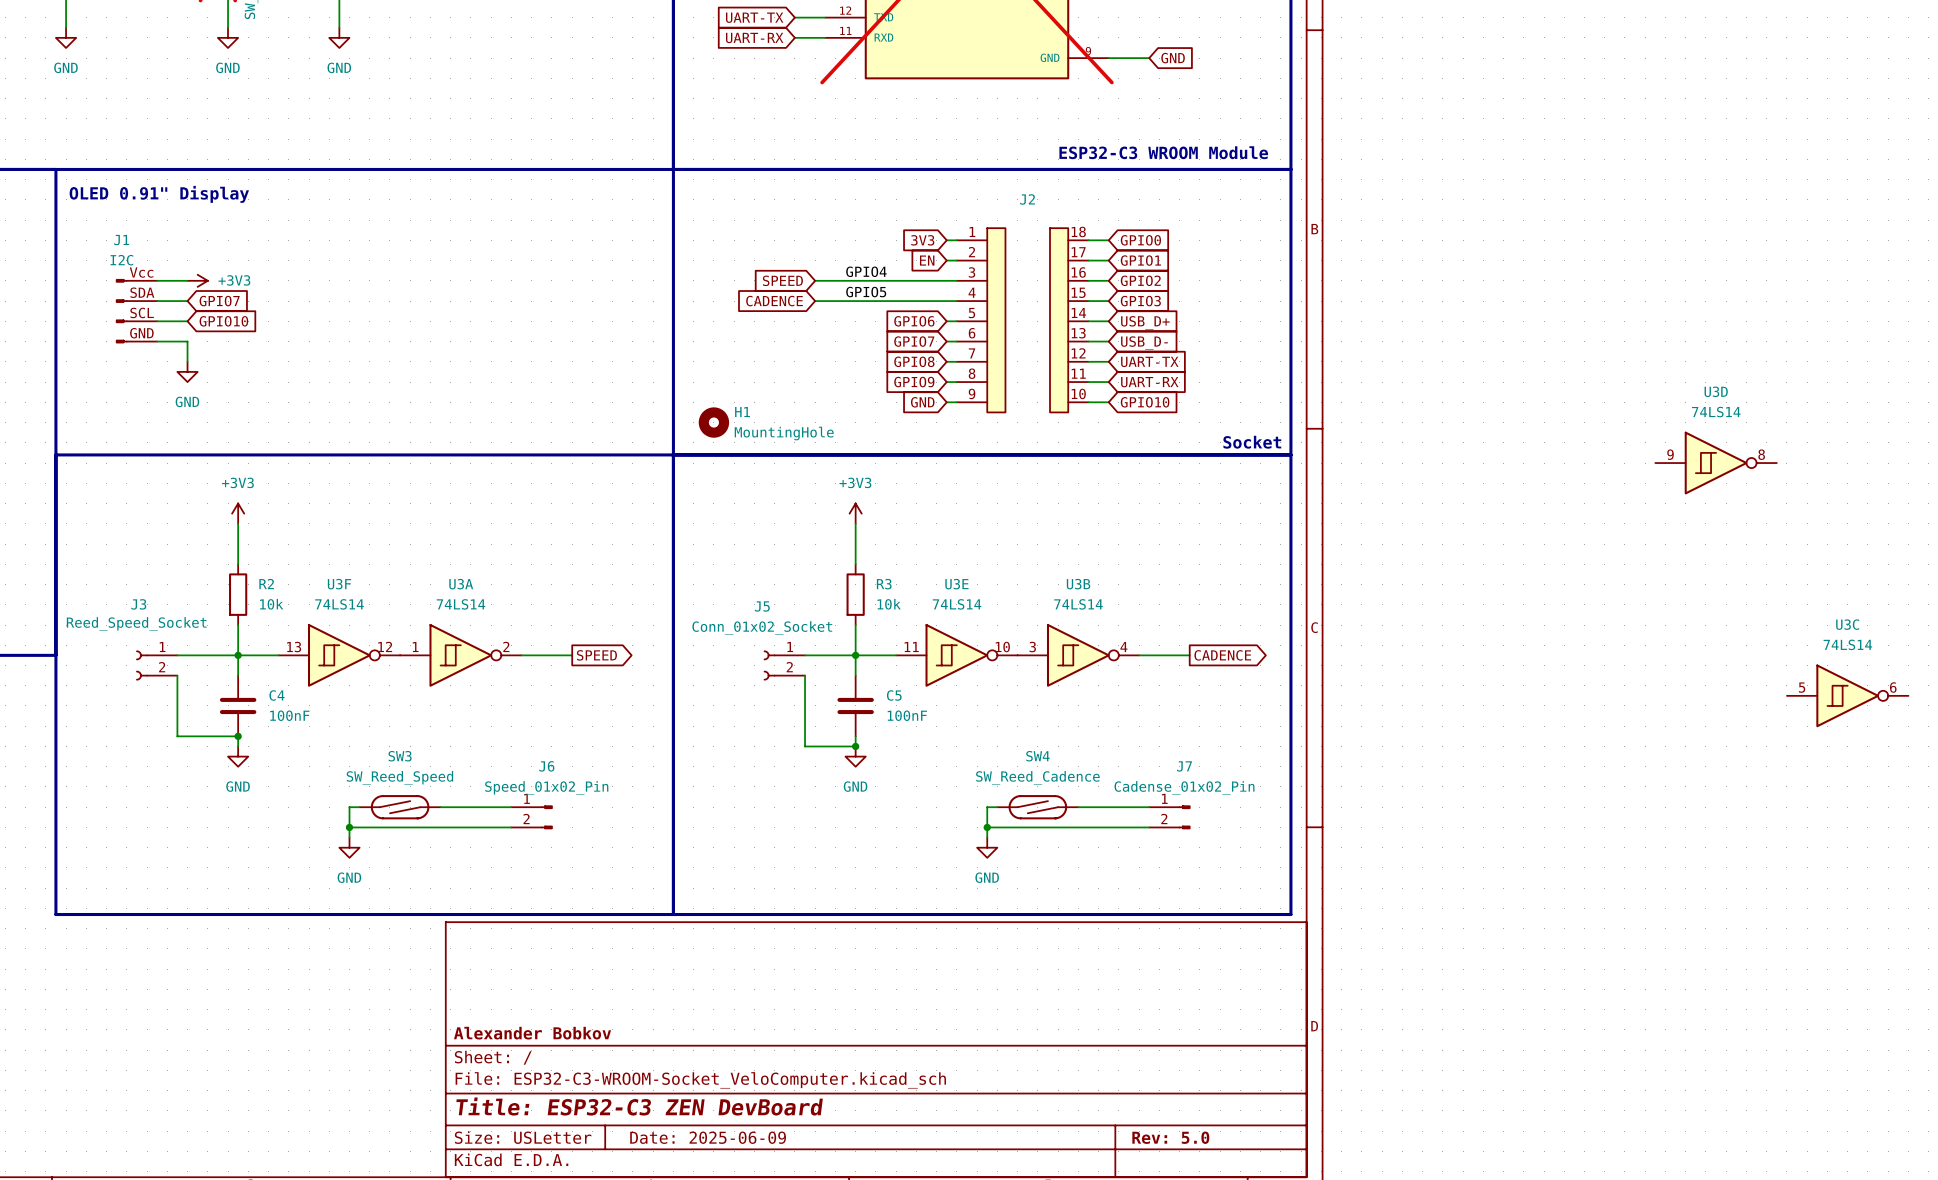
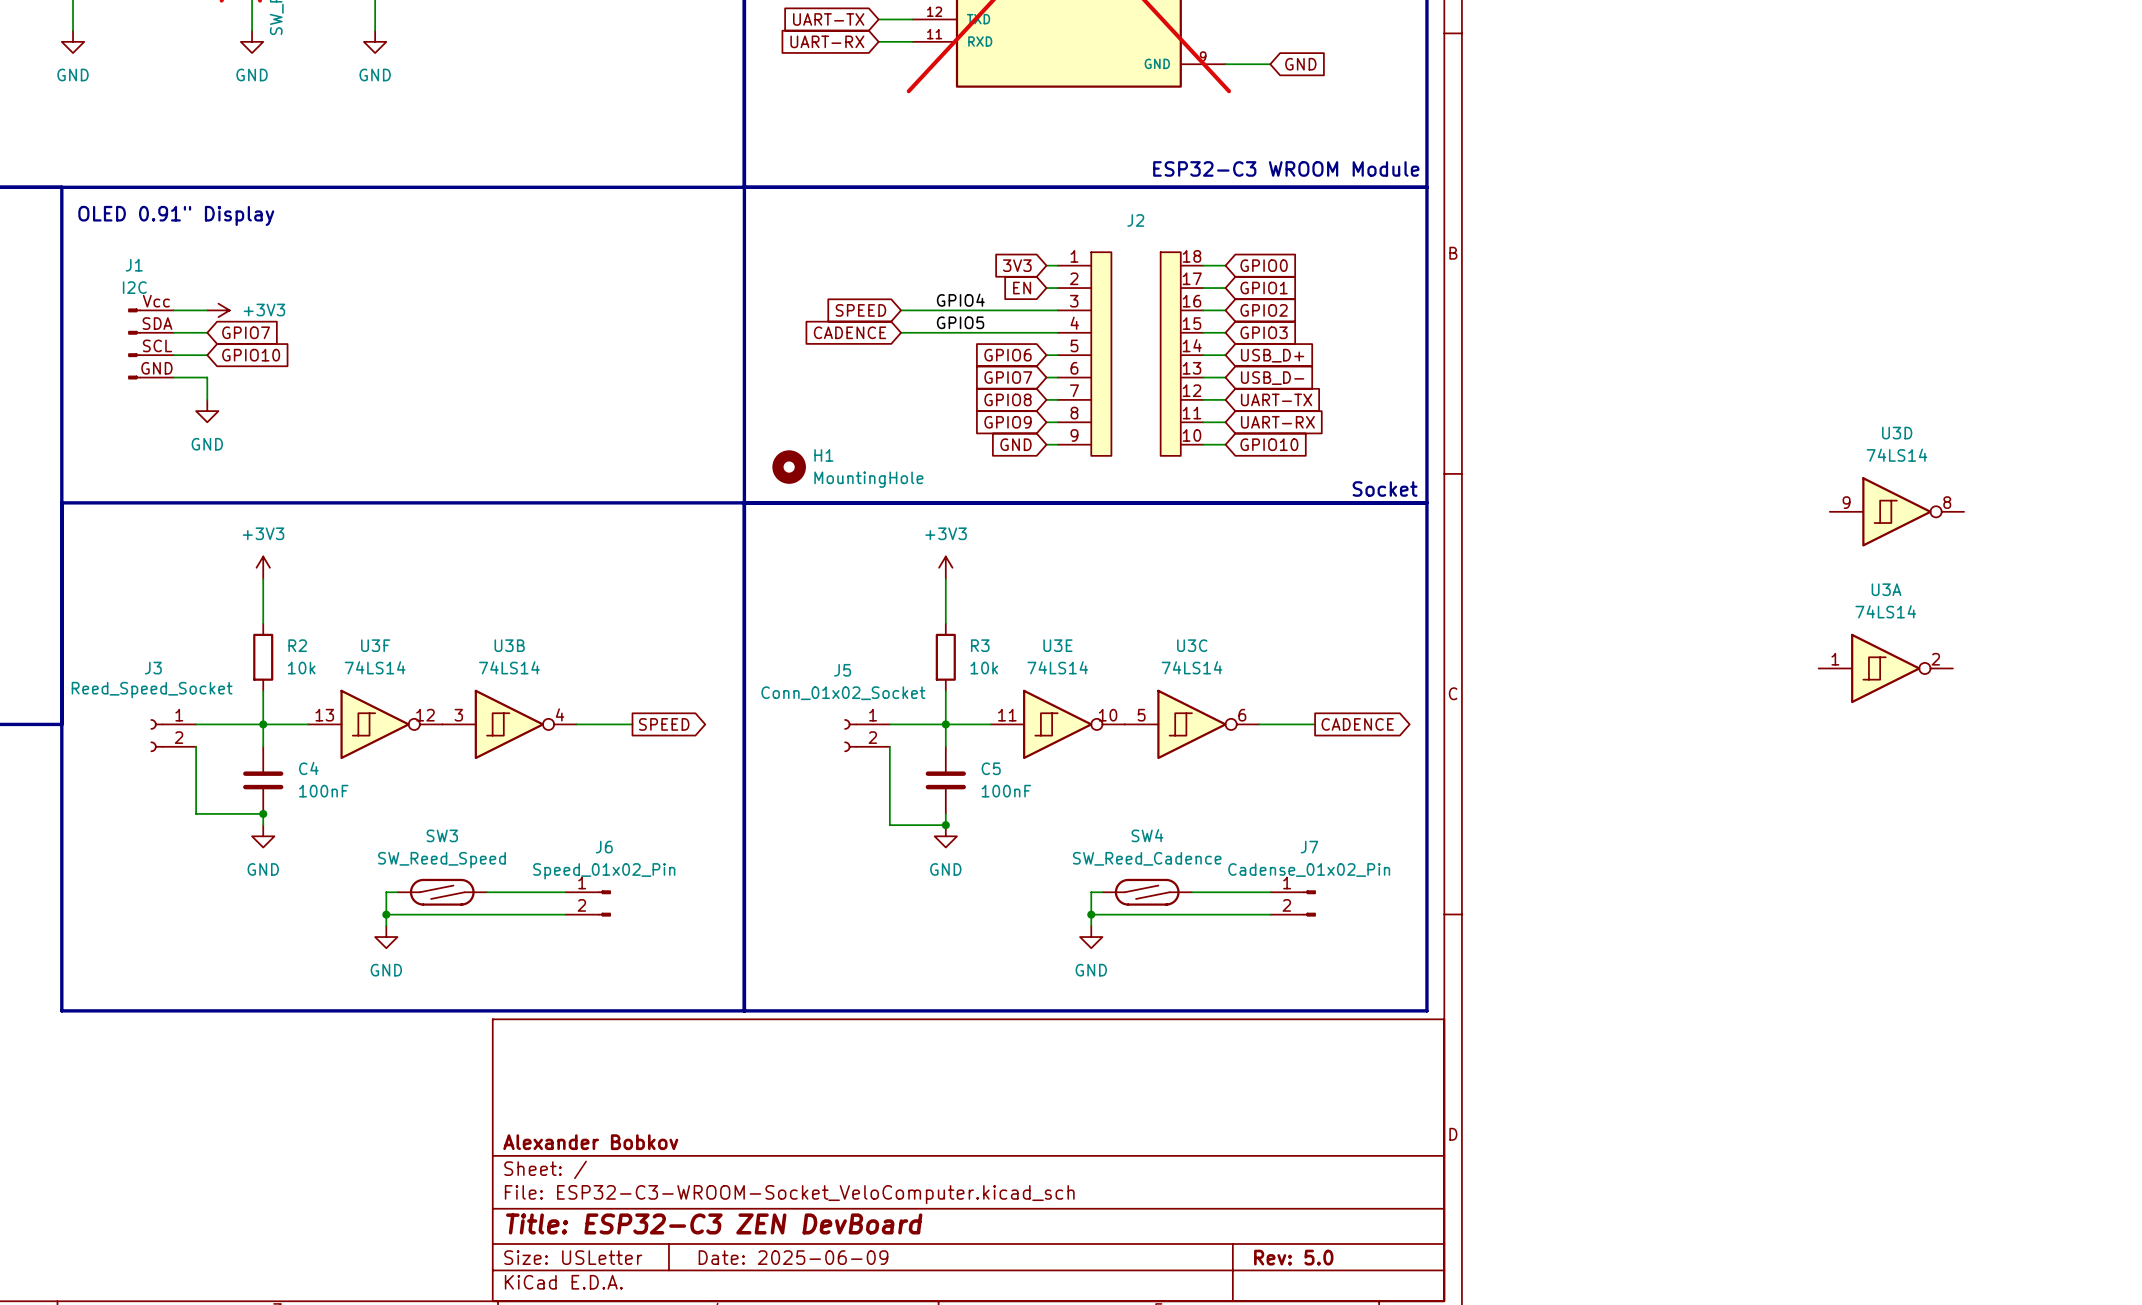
U3A position: (460, 655) -> (1885, 668)
U3B position: (1078, 655) -> (509, 724)
U3C position: (1847, 695) -> (1191, 724)

